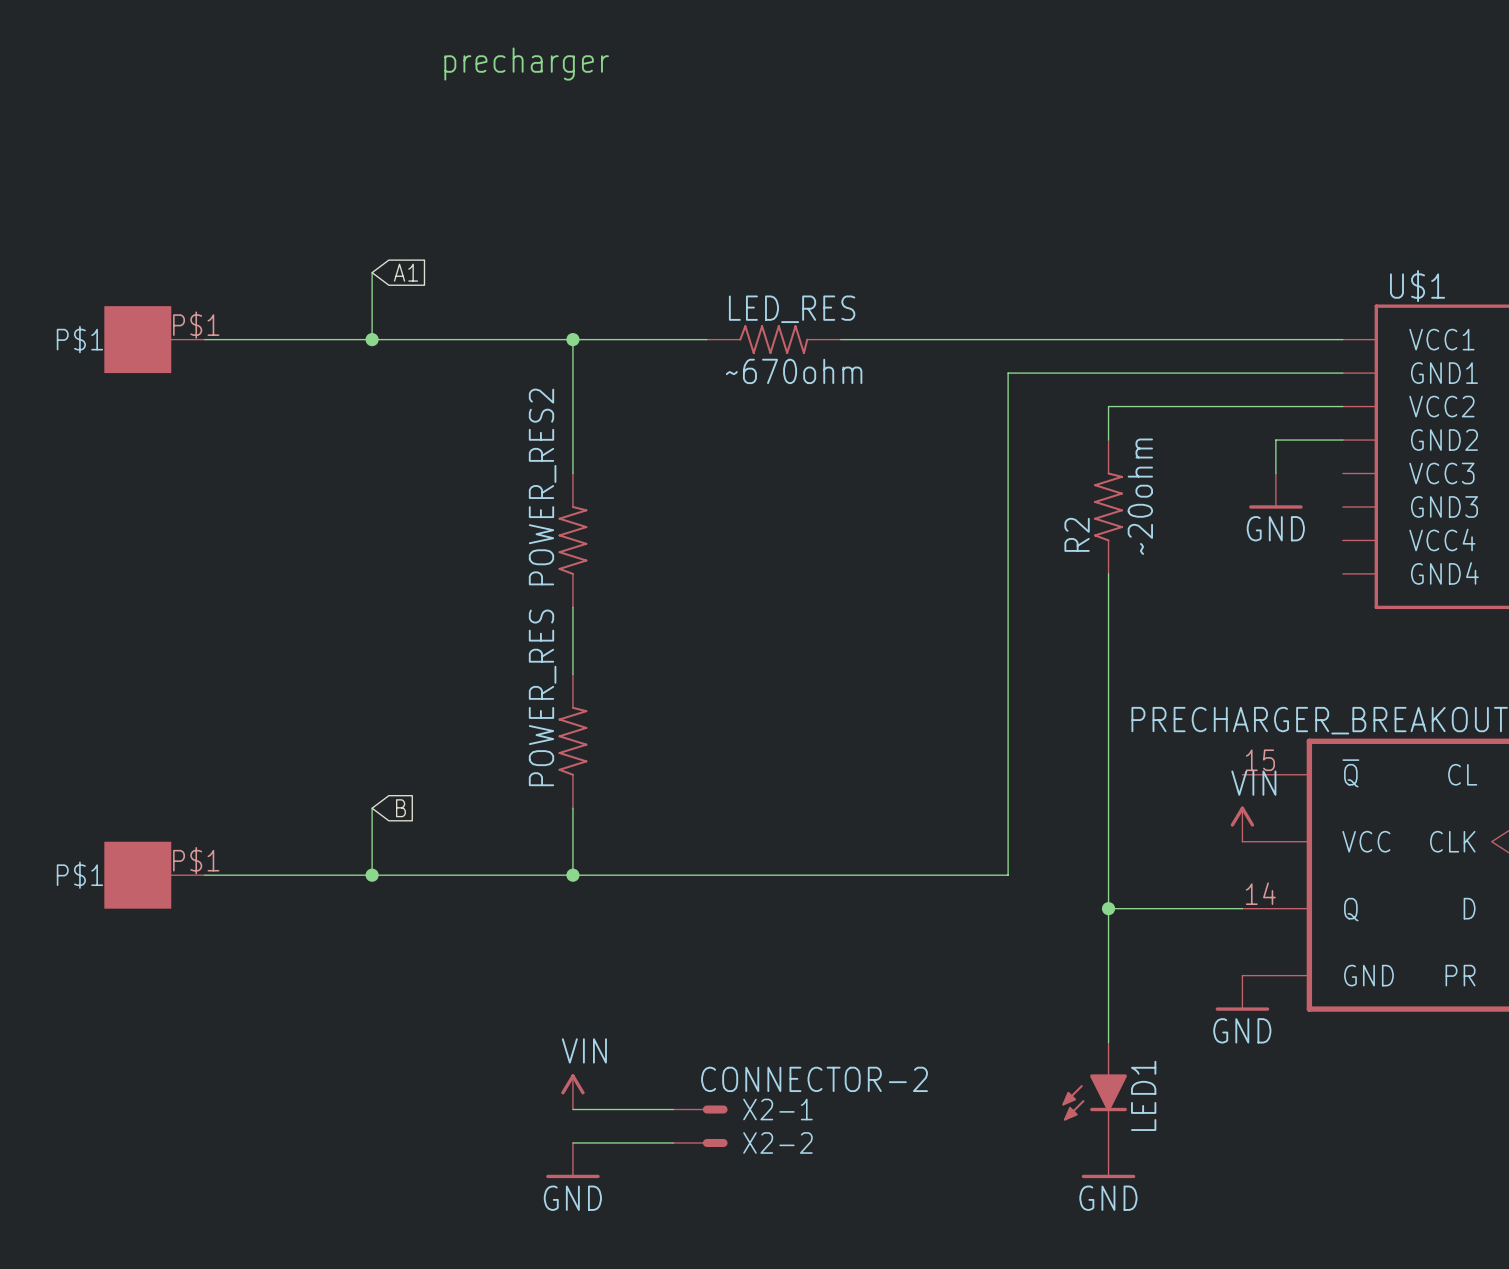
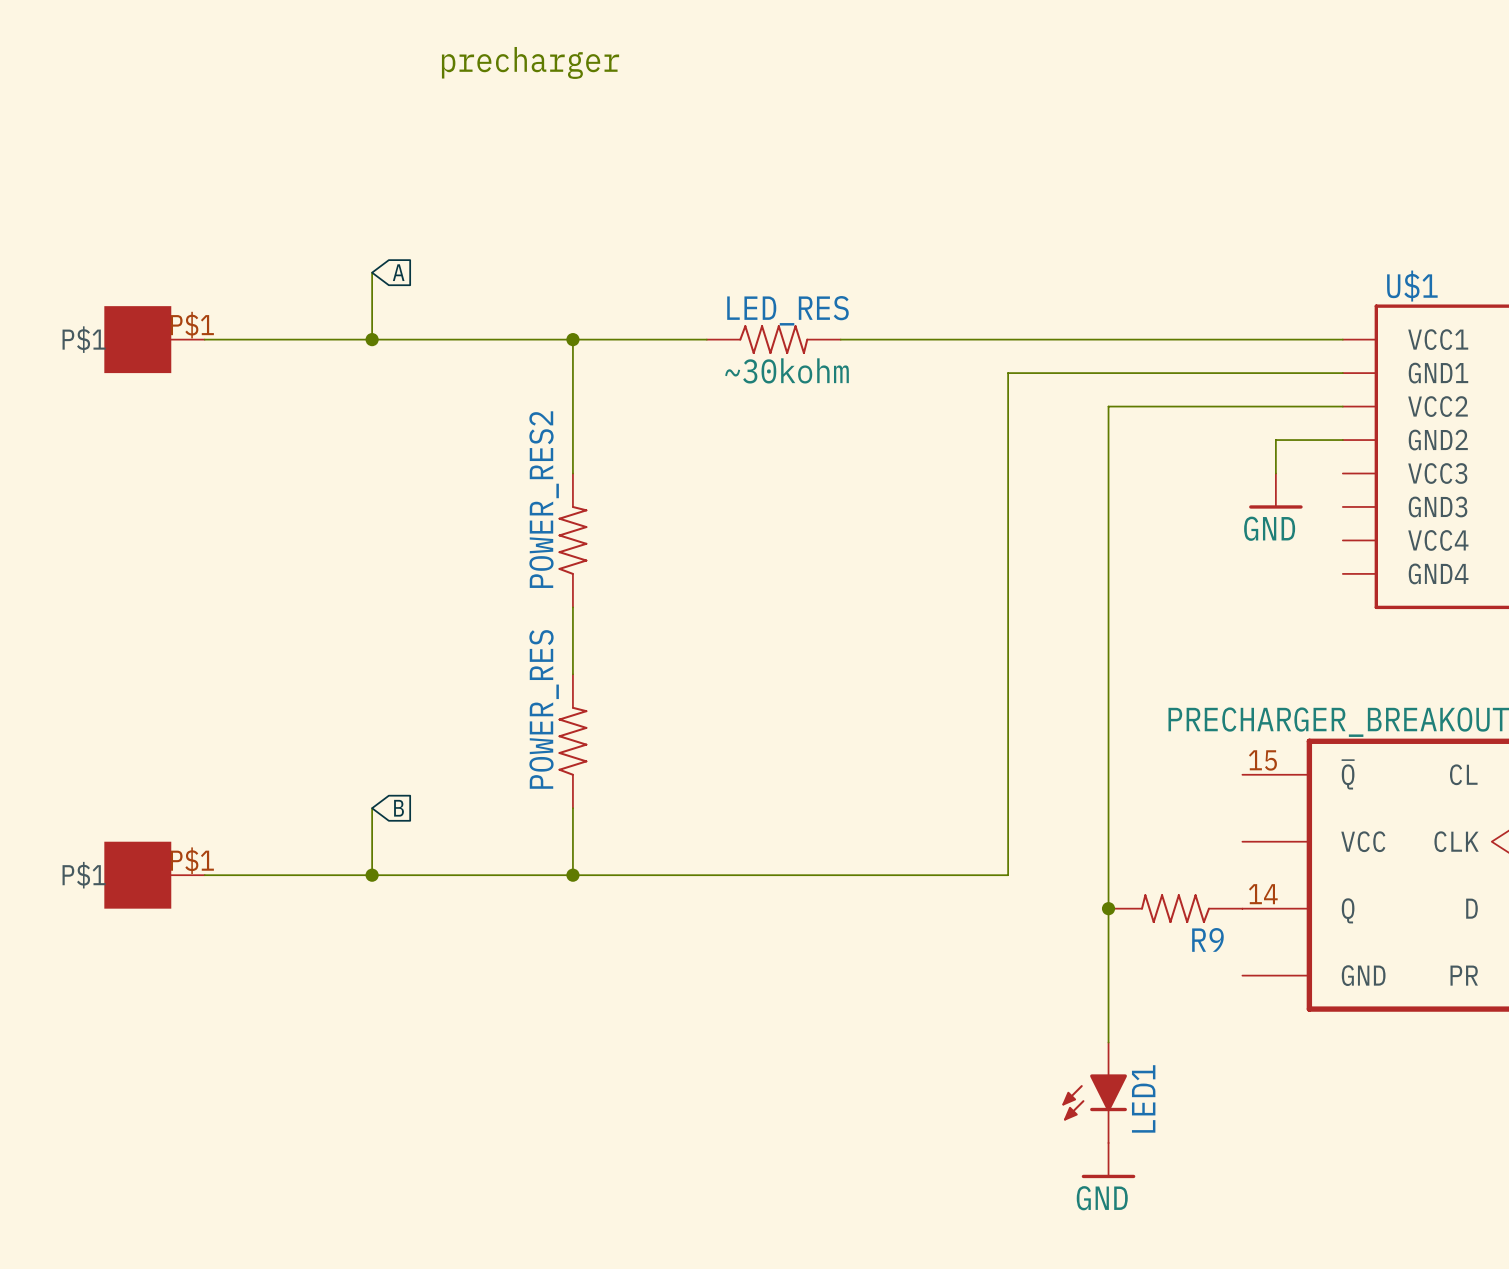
global label: A1 (405, 272) -> A (398, 272)
LED_RES value: ~670ohm (794, 371) -> ~30kohm (787, 370)
R2: ~20ohm (1108, 506) -> none
power symbol: VIN (1242, 824) -> none
R9: none -> (1175, 908)
power symbol: GND (1242, 993) -> none
power symbol: VIN (572, 1091) -> none
wire: (572, 1109) (673, 1109) -> none
X2-1: CONNECTOR-2 (700, 1109) -> none
wire: (572, 1142) (673, 1142) -> none
X2-2: (700, 1142) -> none
power symbol: GND (572, 1160) -> none

